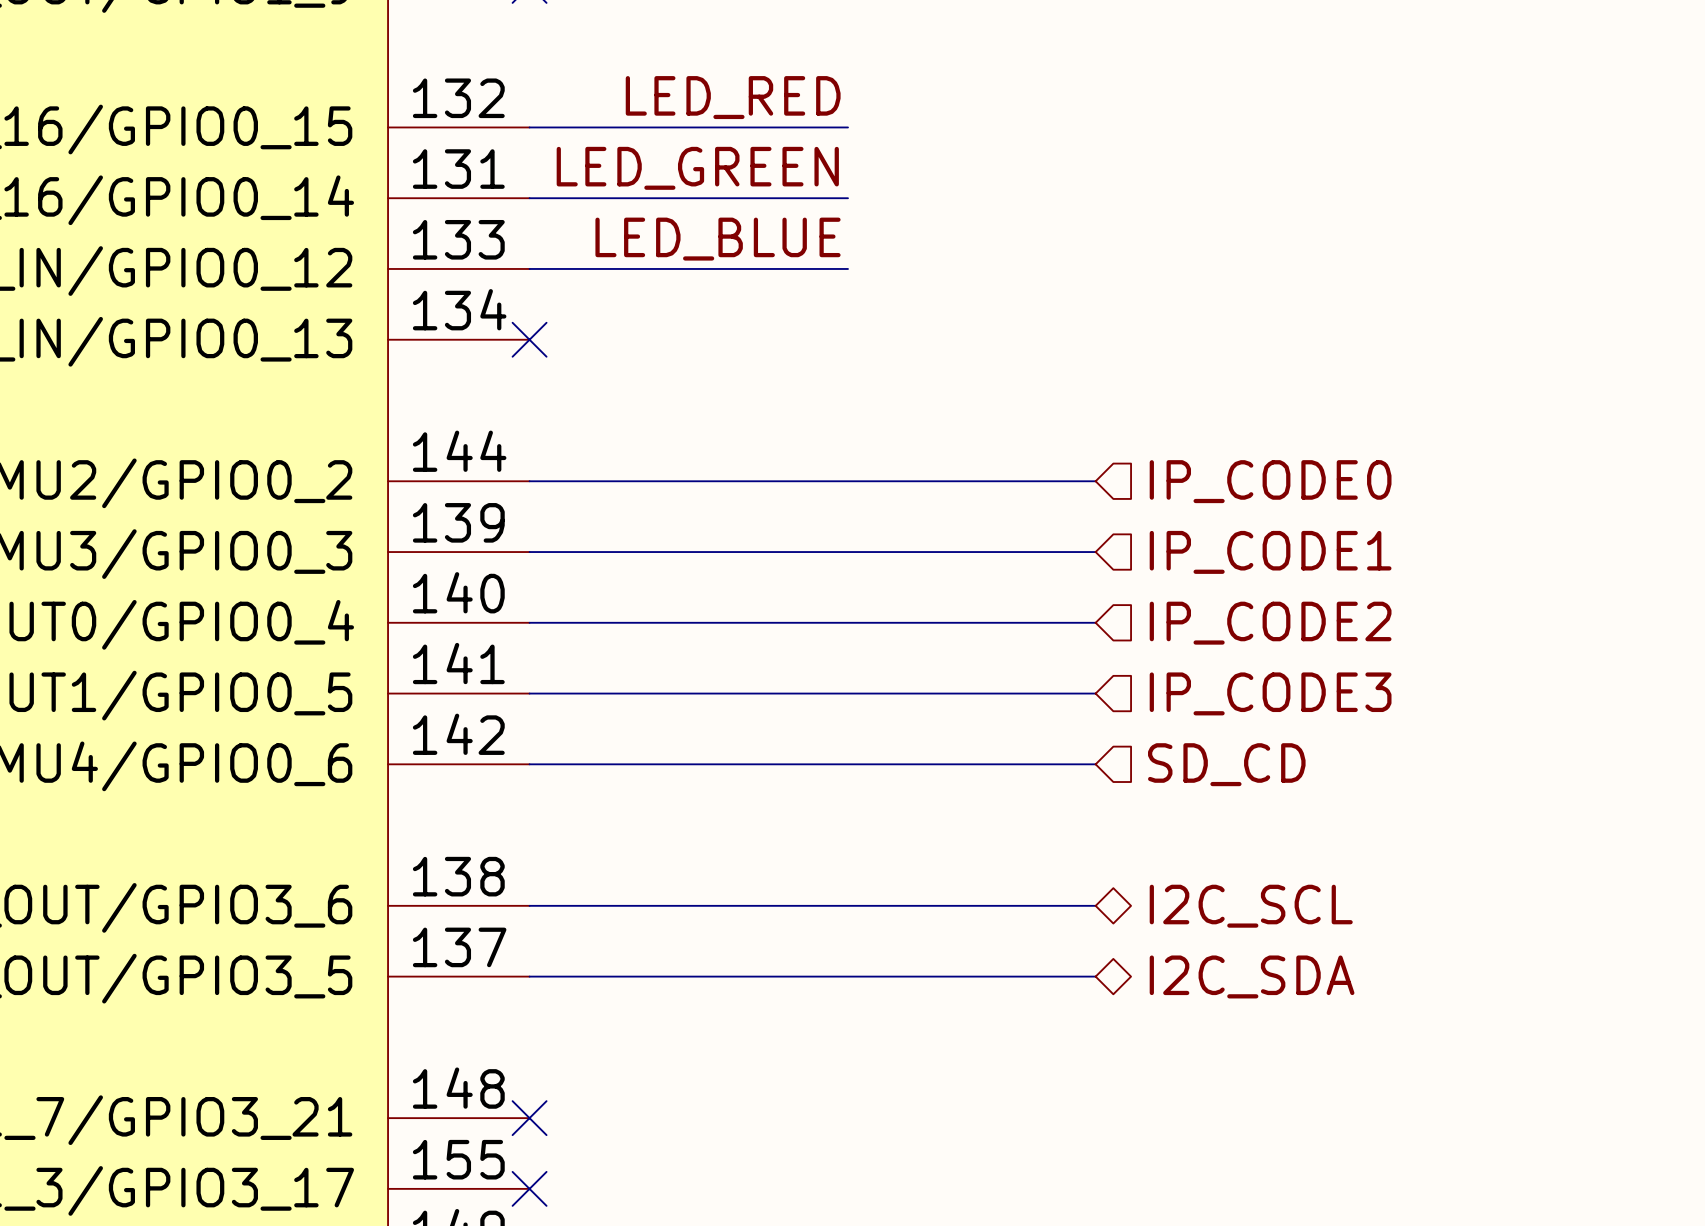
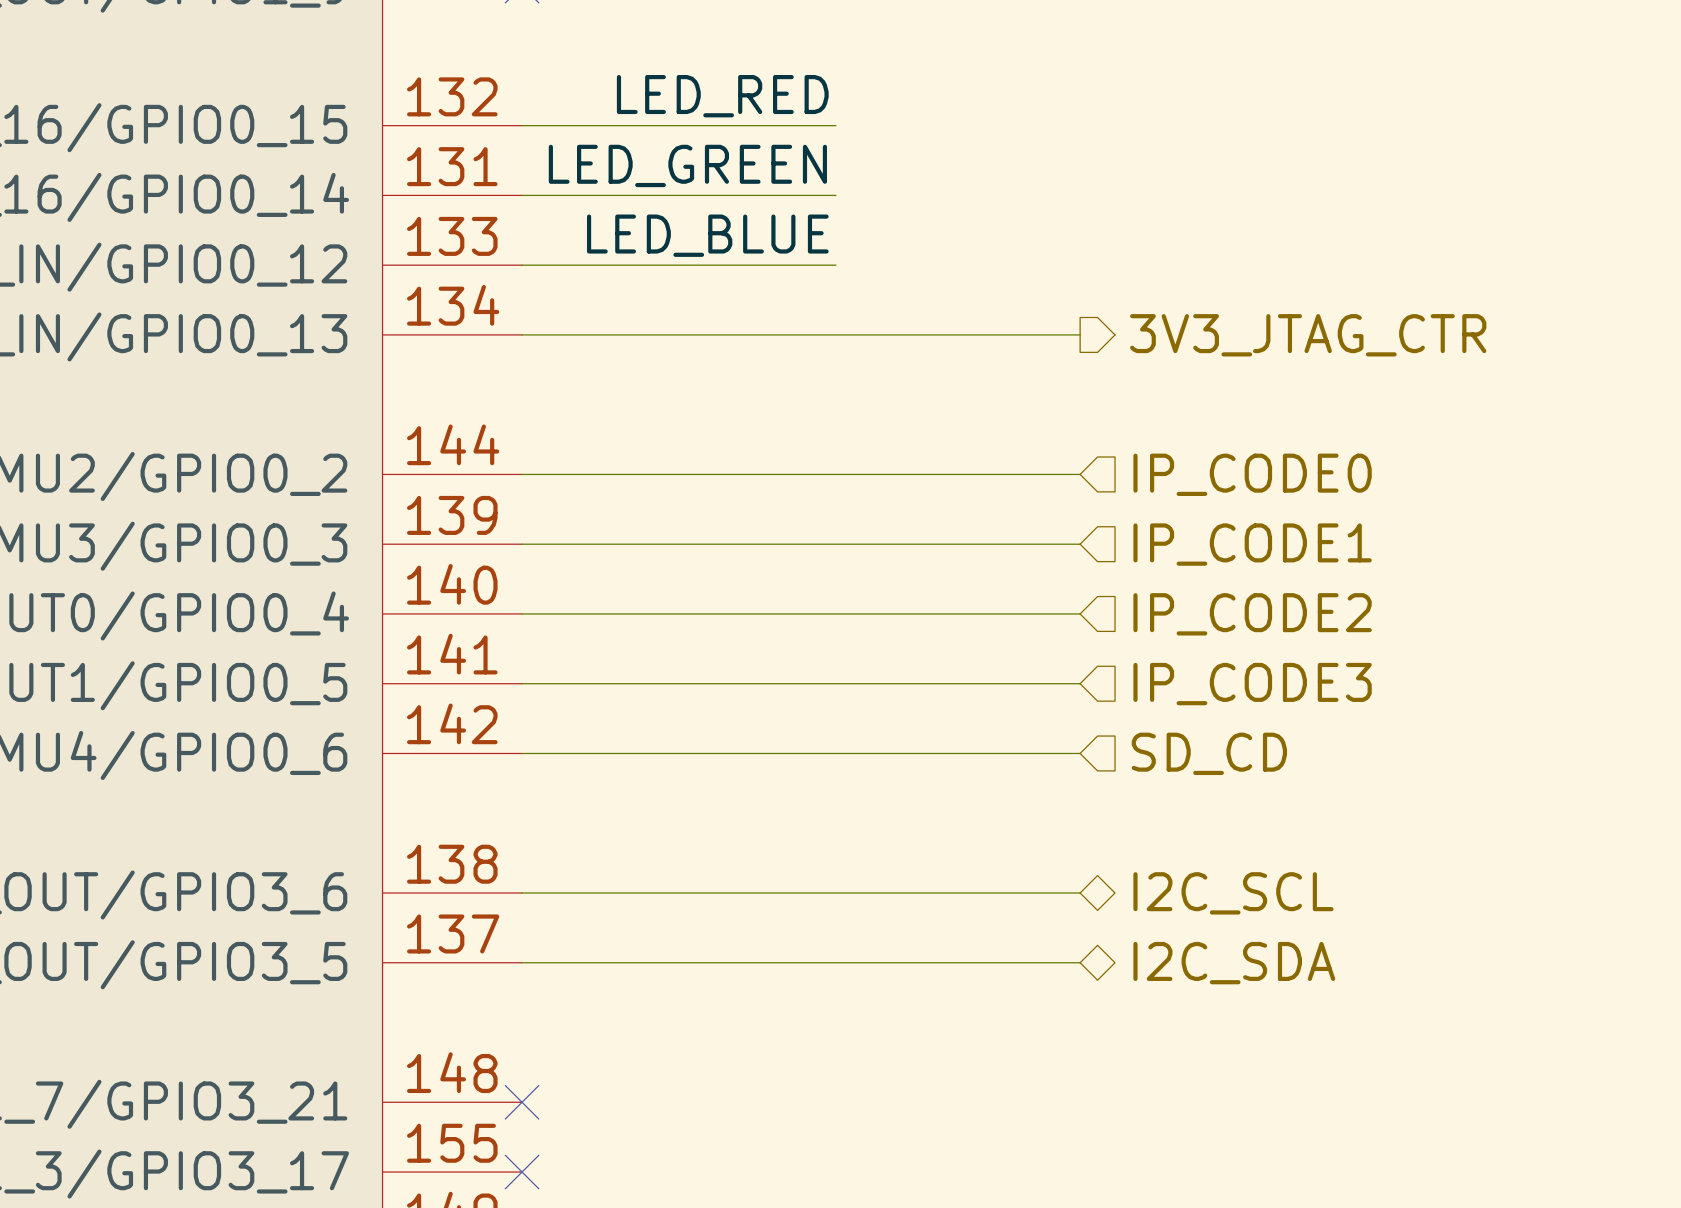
wire: none -> (522, 334) (1080, 334)
no-connect mark: (529, 339) -> none
hierarchical label: none -> 3V3_JTAG_CTR (1308, 335)

